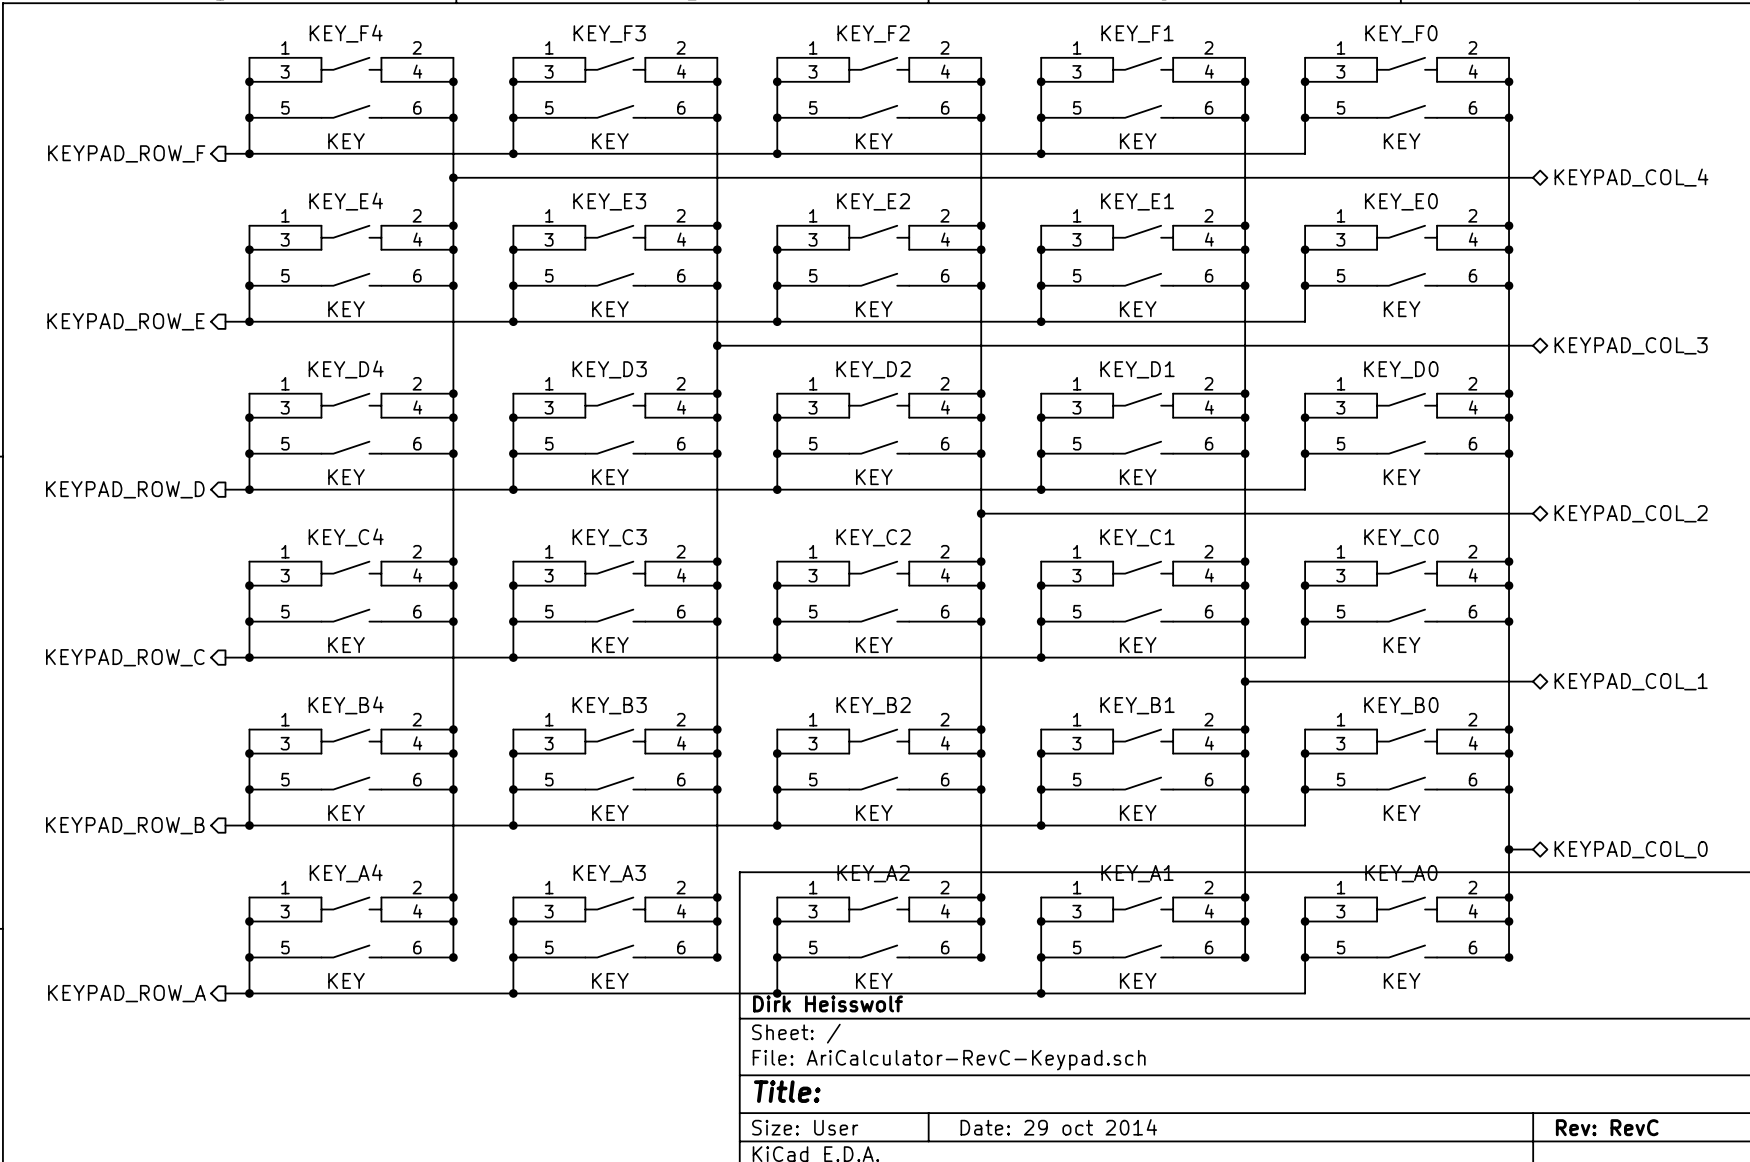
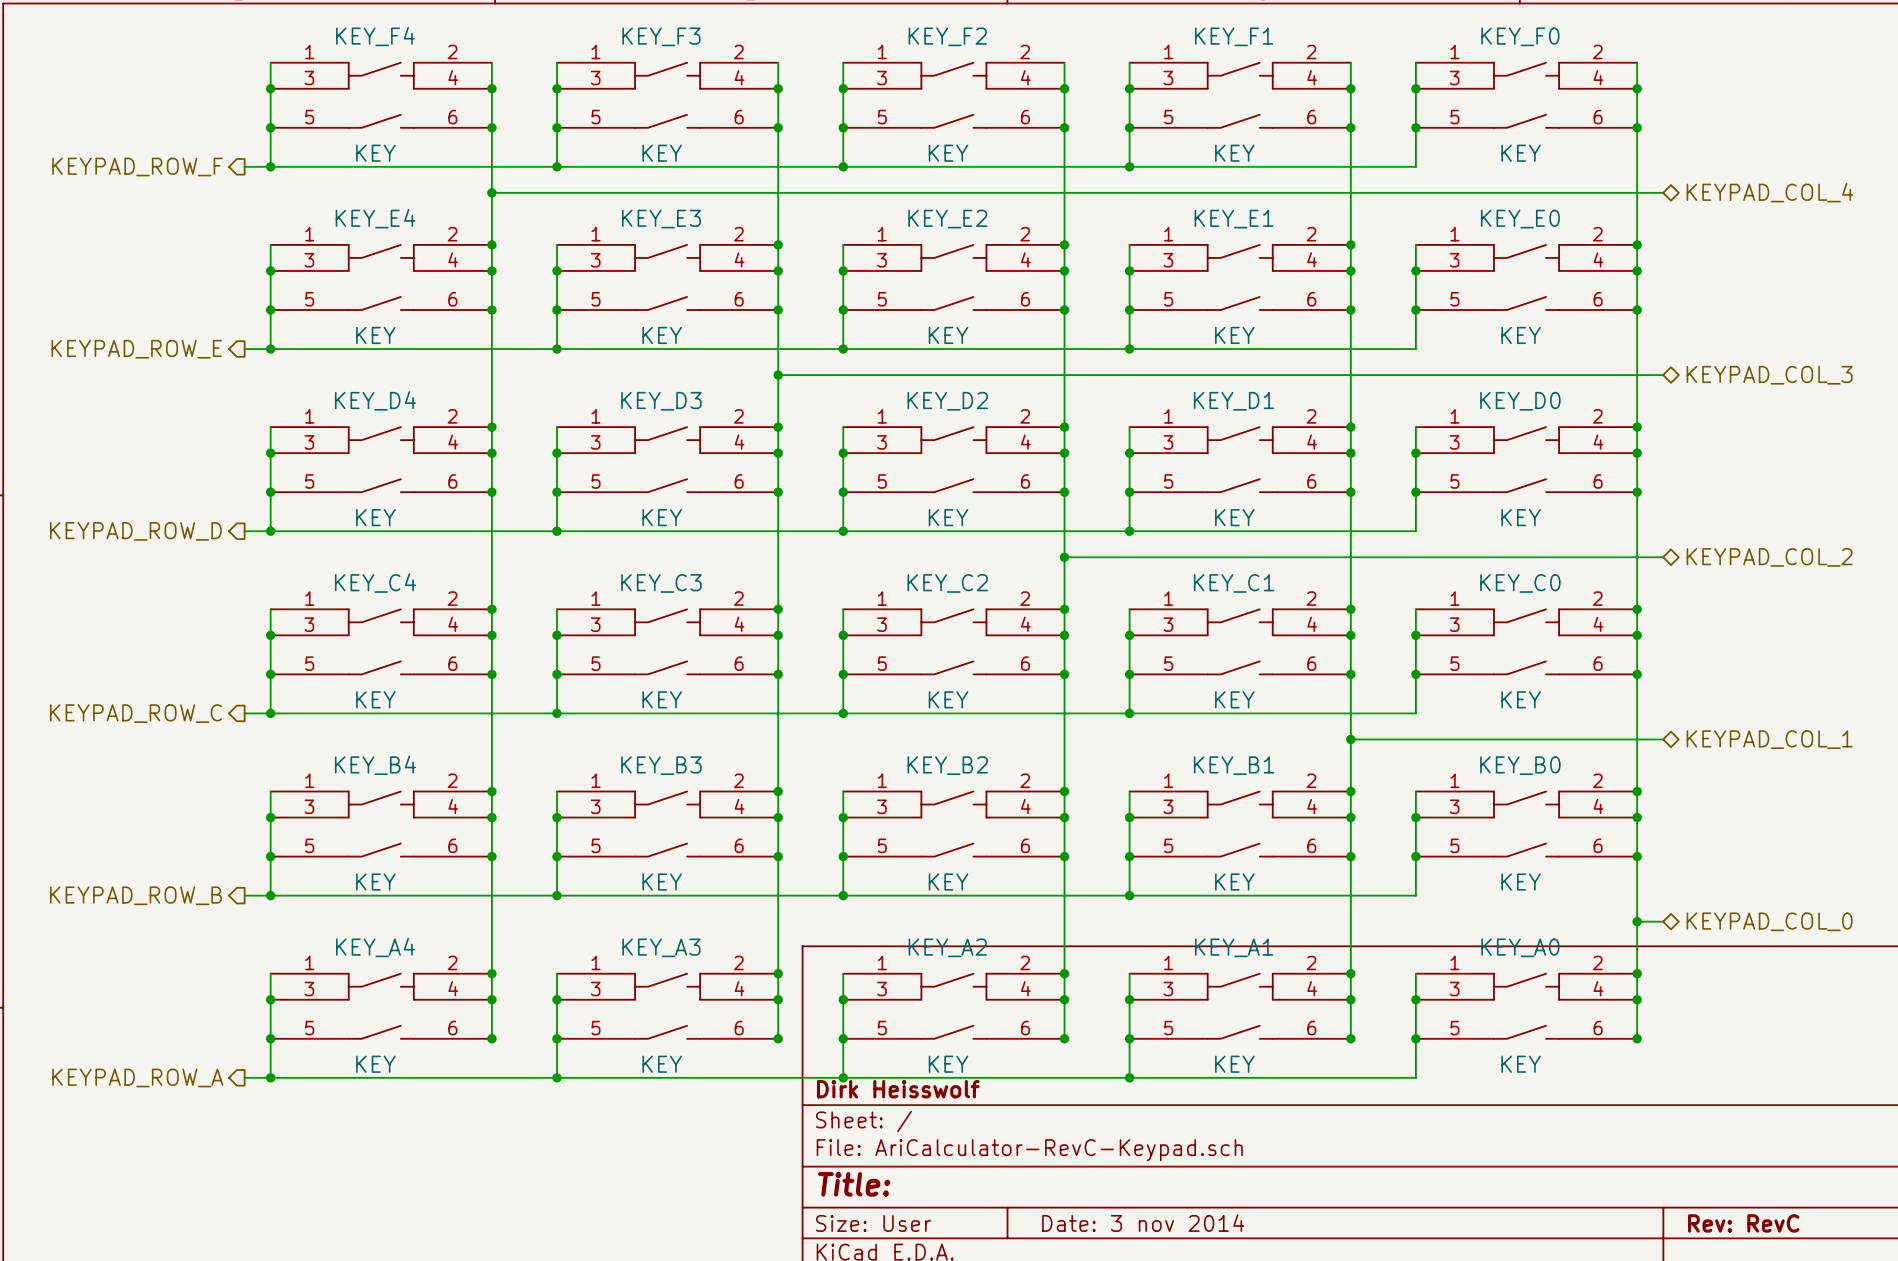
title block: Date: 29 oct 2014 (1058, 1127) -> Date: 3 nov 2014 (1143, 1223)

